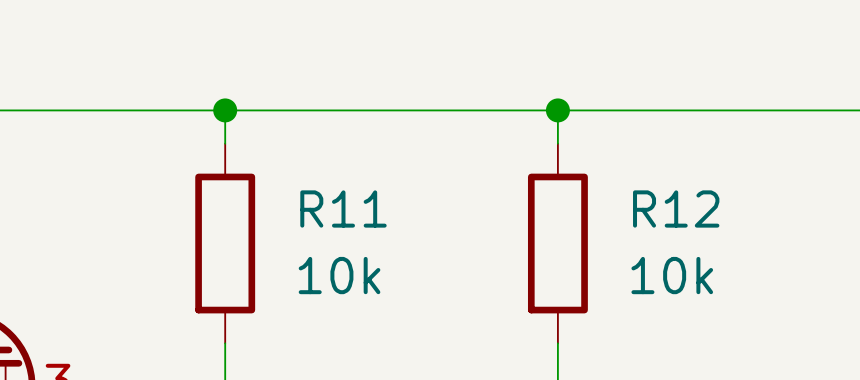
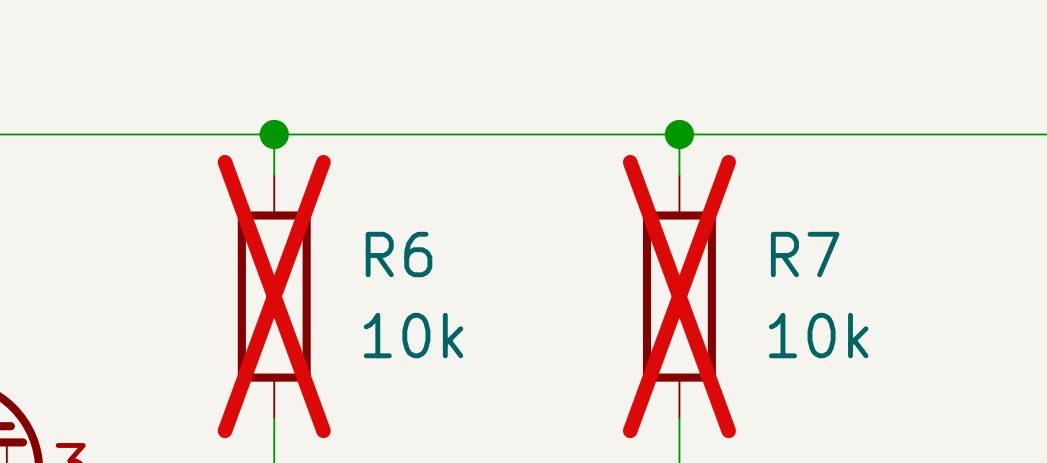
R11 name: R11 (343, 208) -> R6 (399, 254)
R12 name: R12 (676, 208) -> R7 (805, 254)
R11 do-not-place cross: none -> (274, 296)
R12 do-not-place cross: none -> (679, 296)

